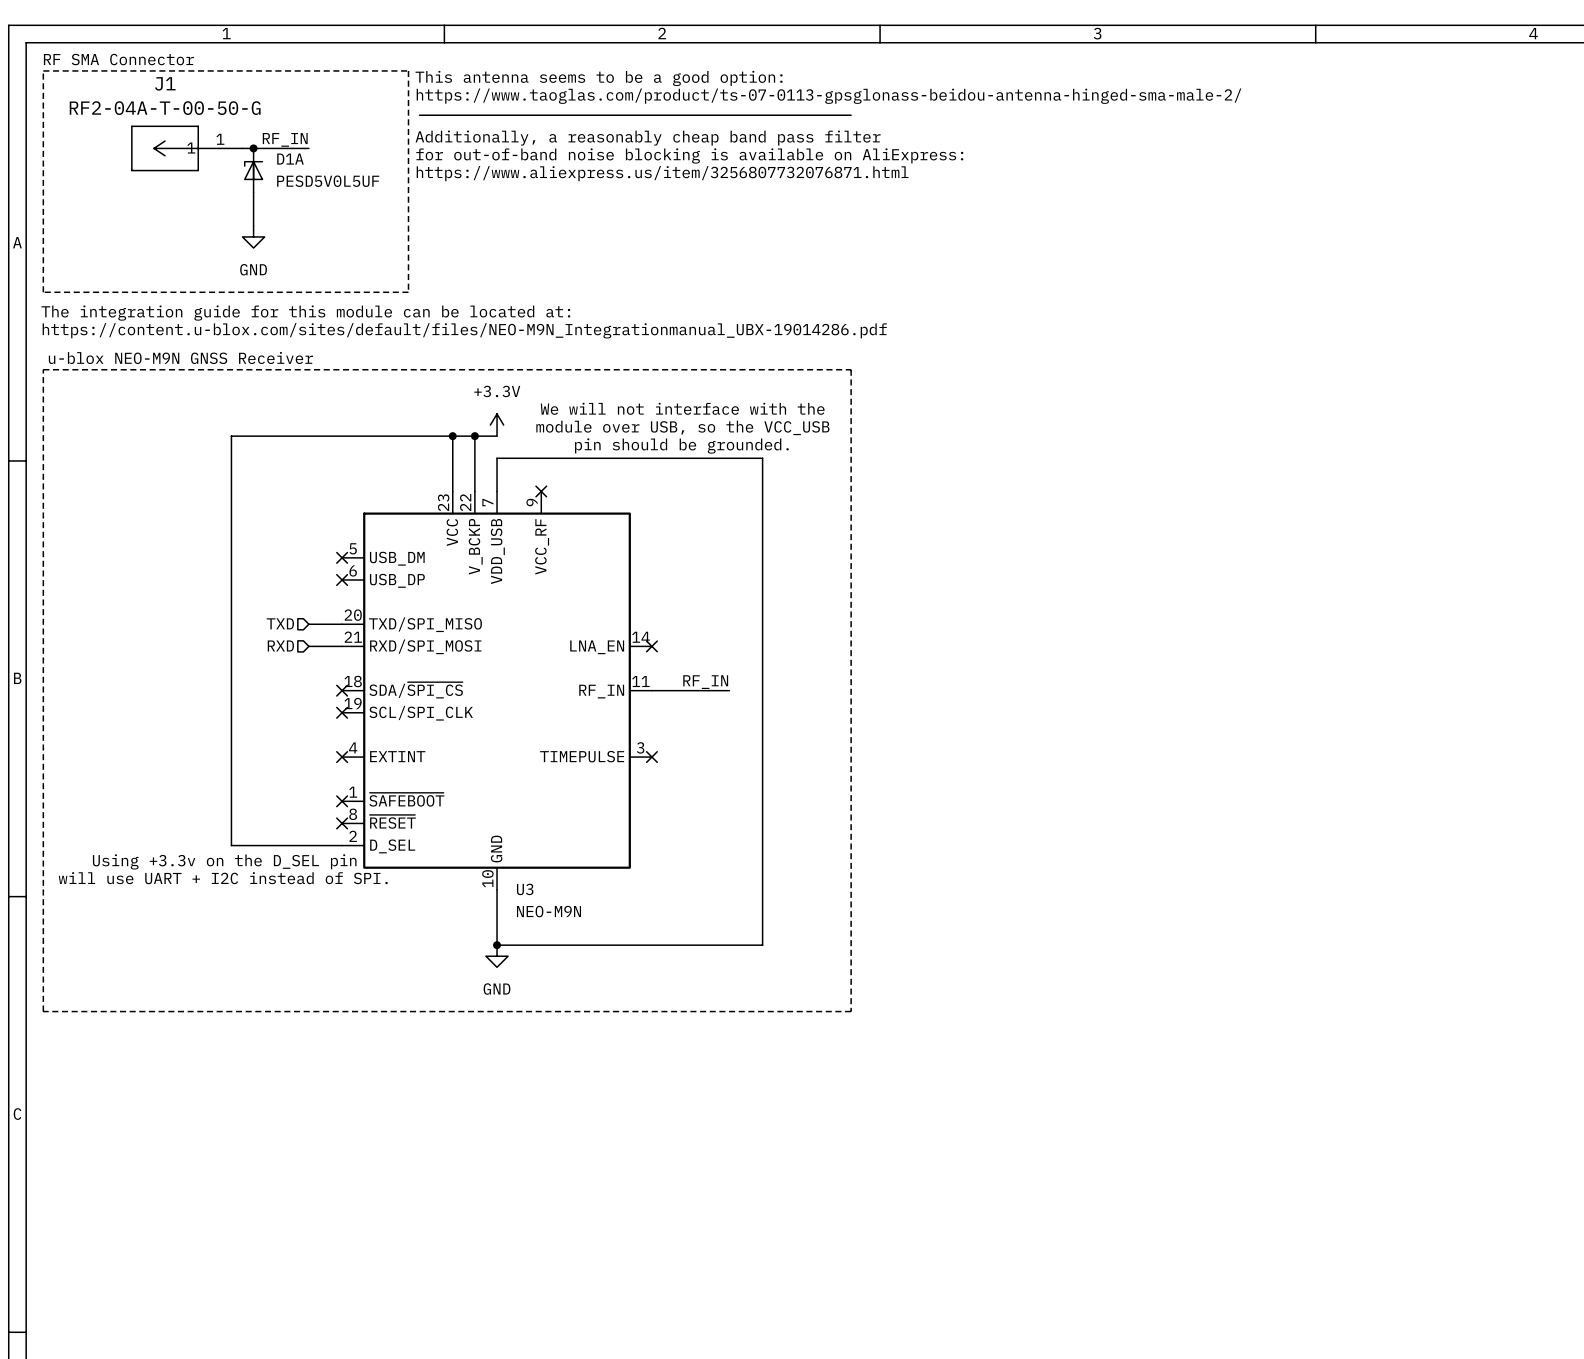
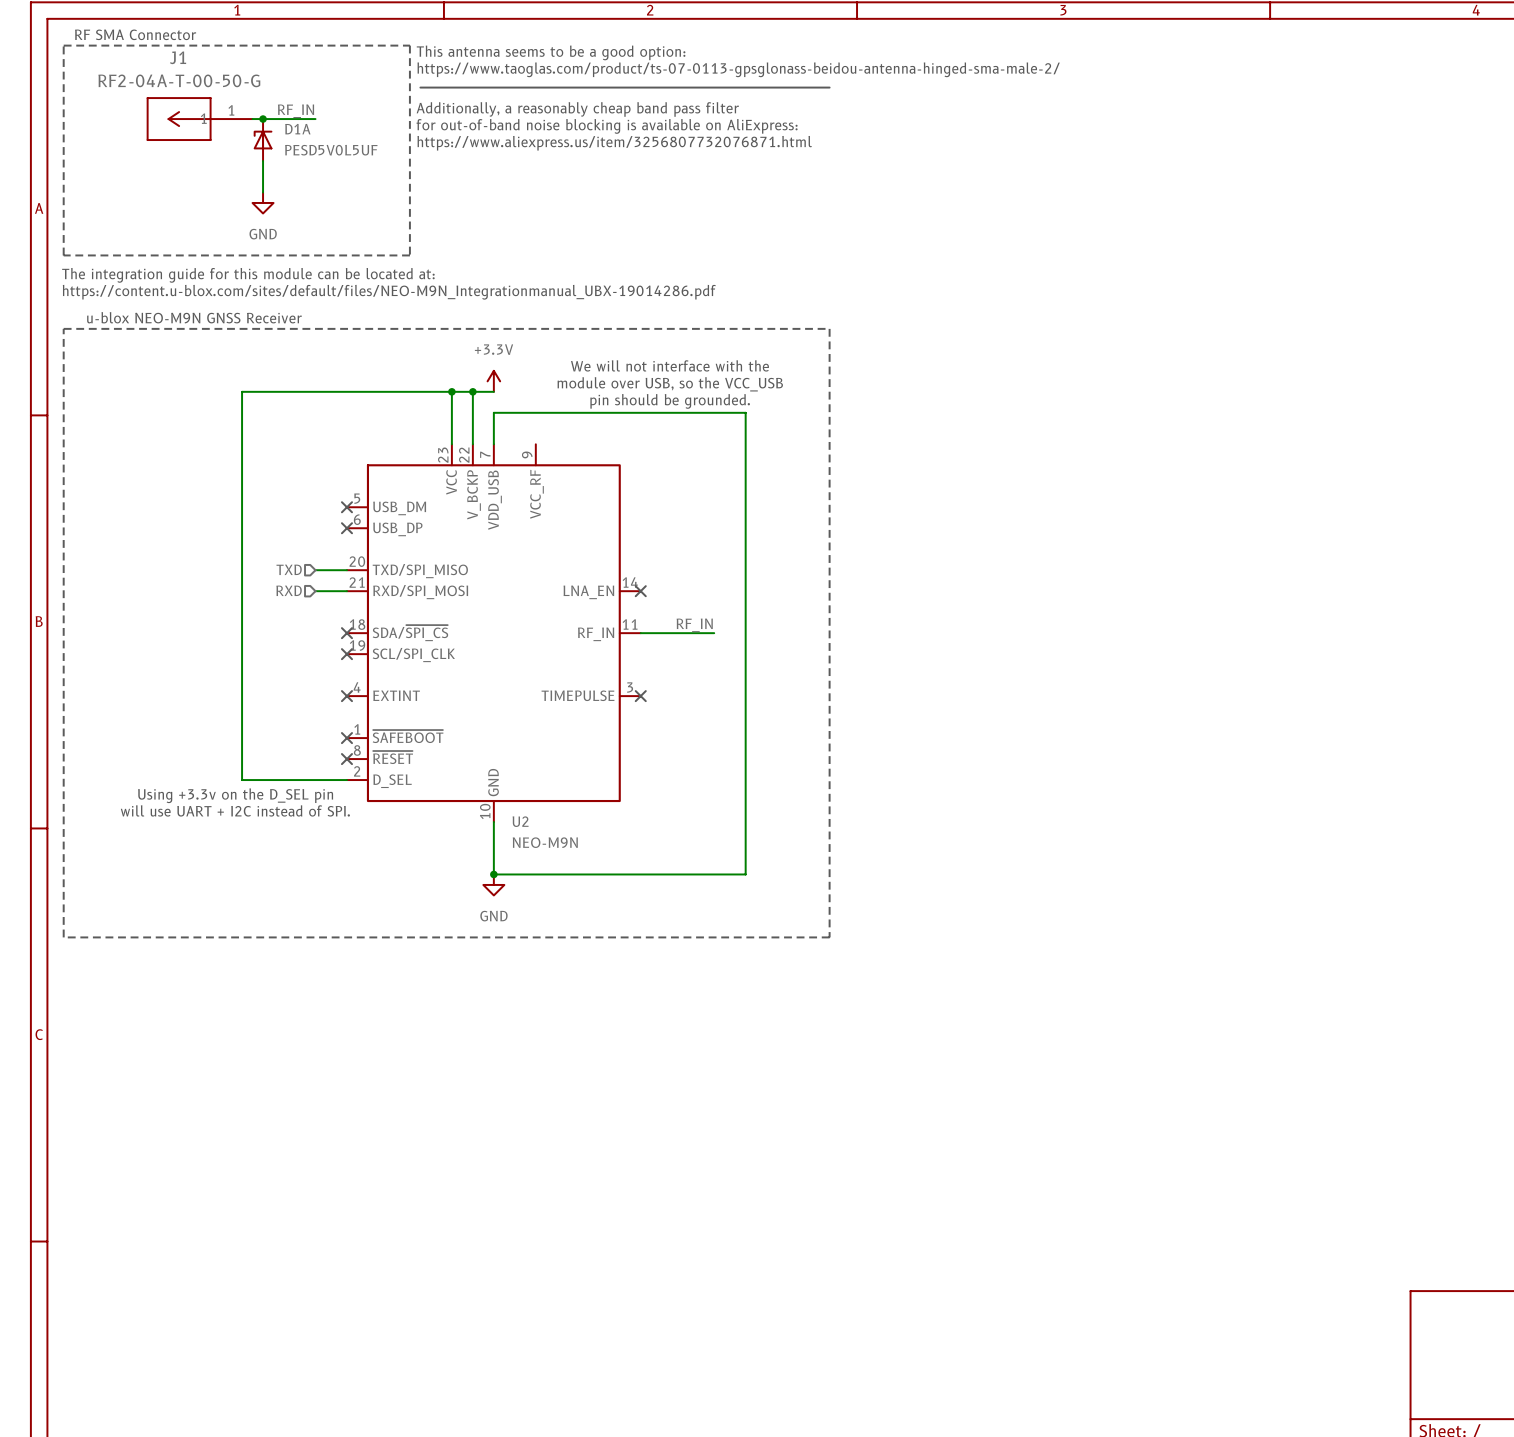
no-connect mark: (541, 491) -> none
U3 name: U3 (525, 889) -> U2 (520, 821)

